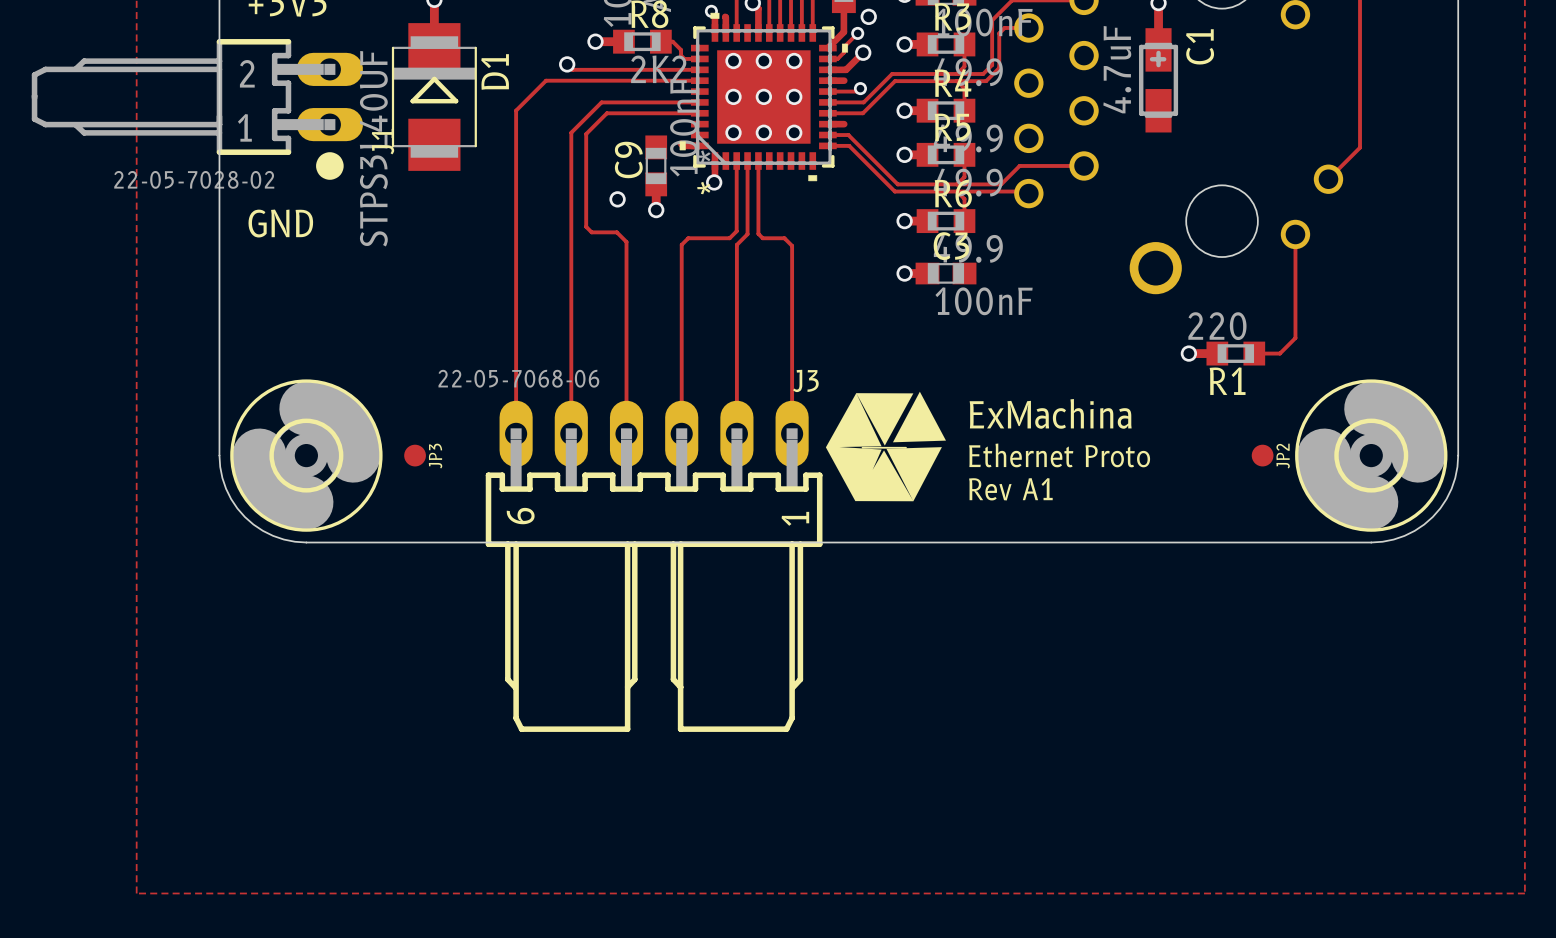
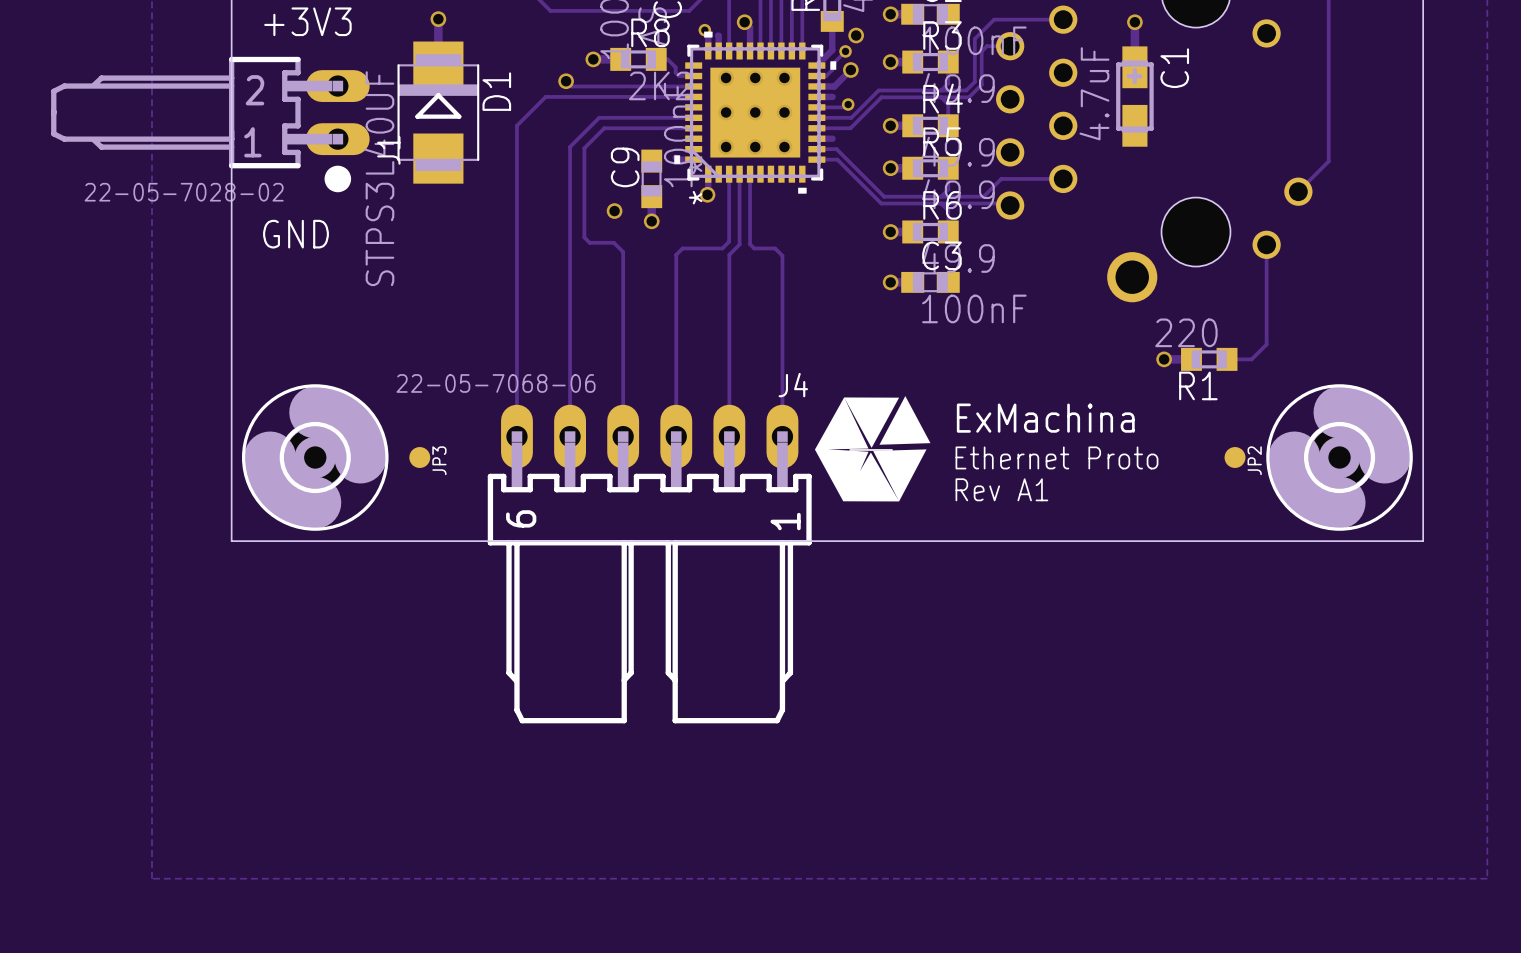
J3 name: J3 (805, 380) -> J4 (793, 385)
board edge: (219, 455) (226, 488) (244, 517) (273, 535) (306, 542) -> (231, 457) (231, 541) (315, 541)
board edge: (1458, 455) (1451, 488) (1432, 517) (1404, 535) (1371, 542) -> (1423, 457) (1423, 541) (1339, 541)

